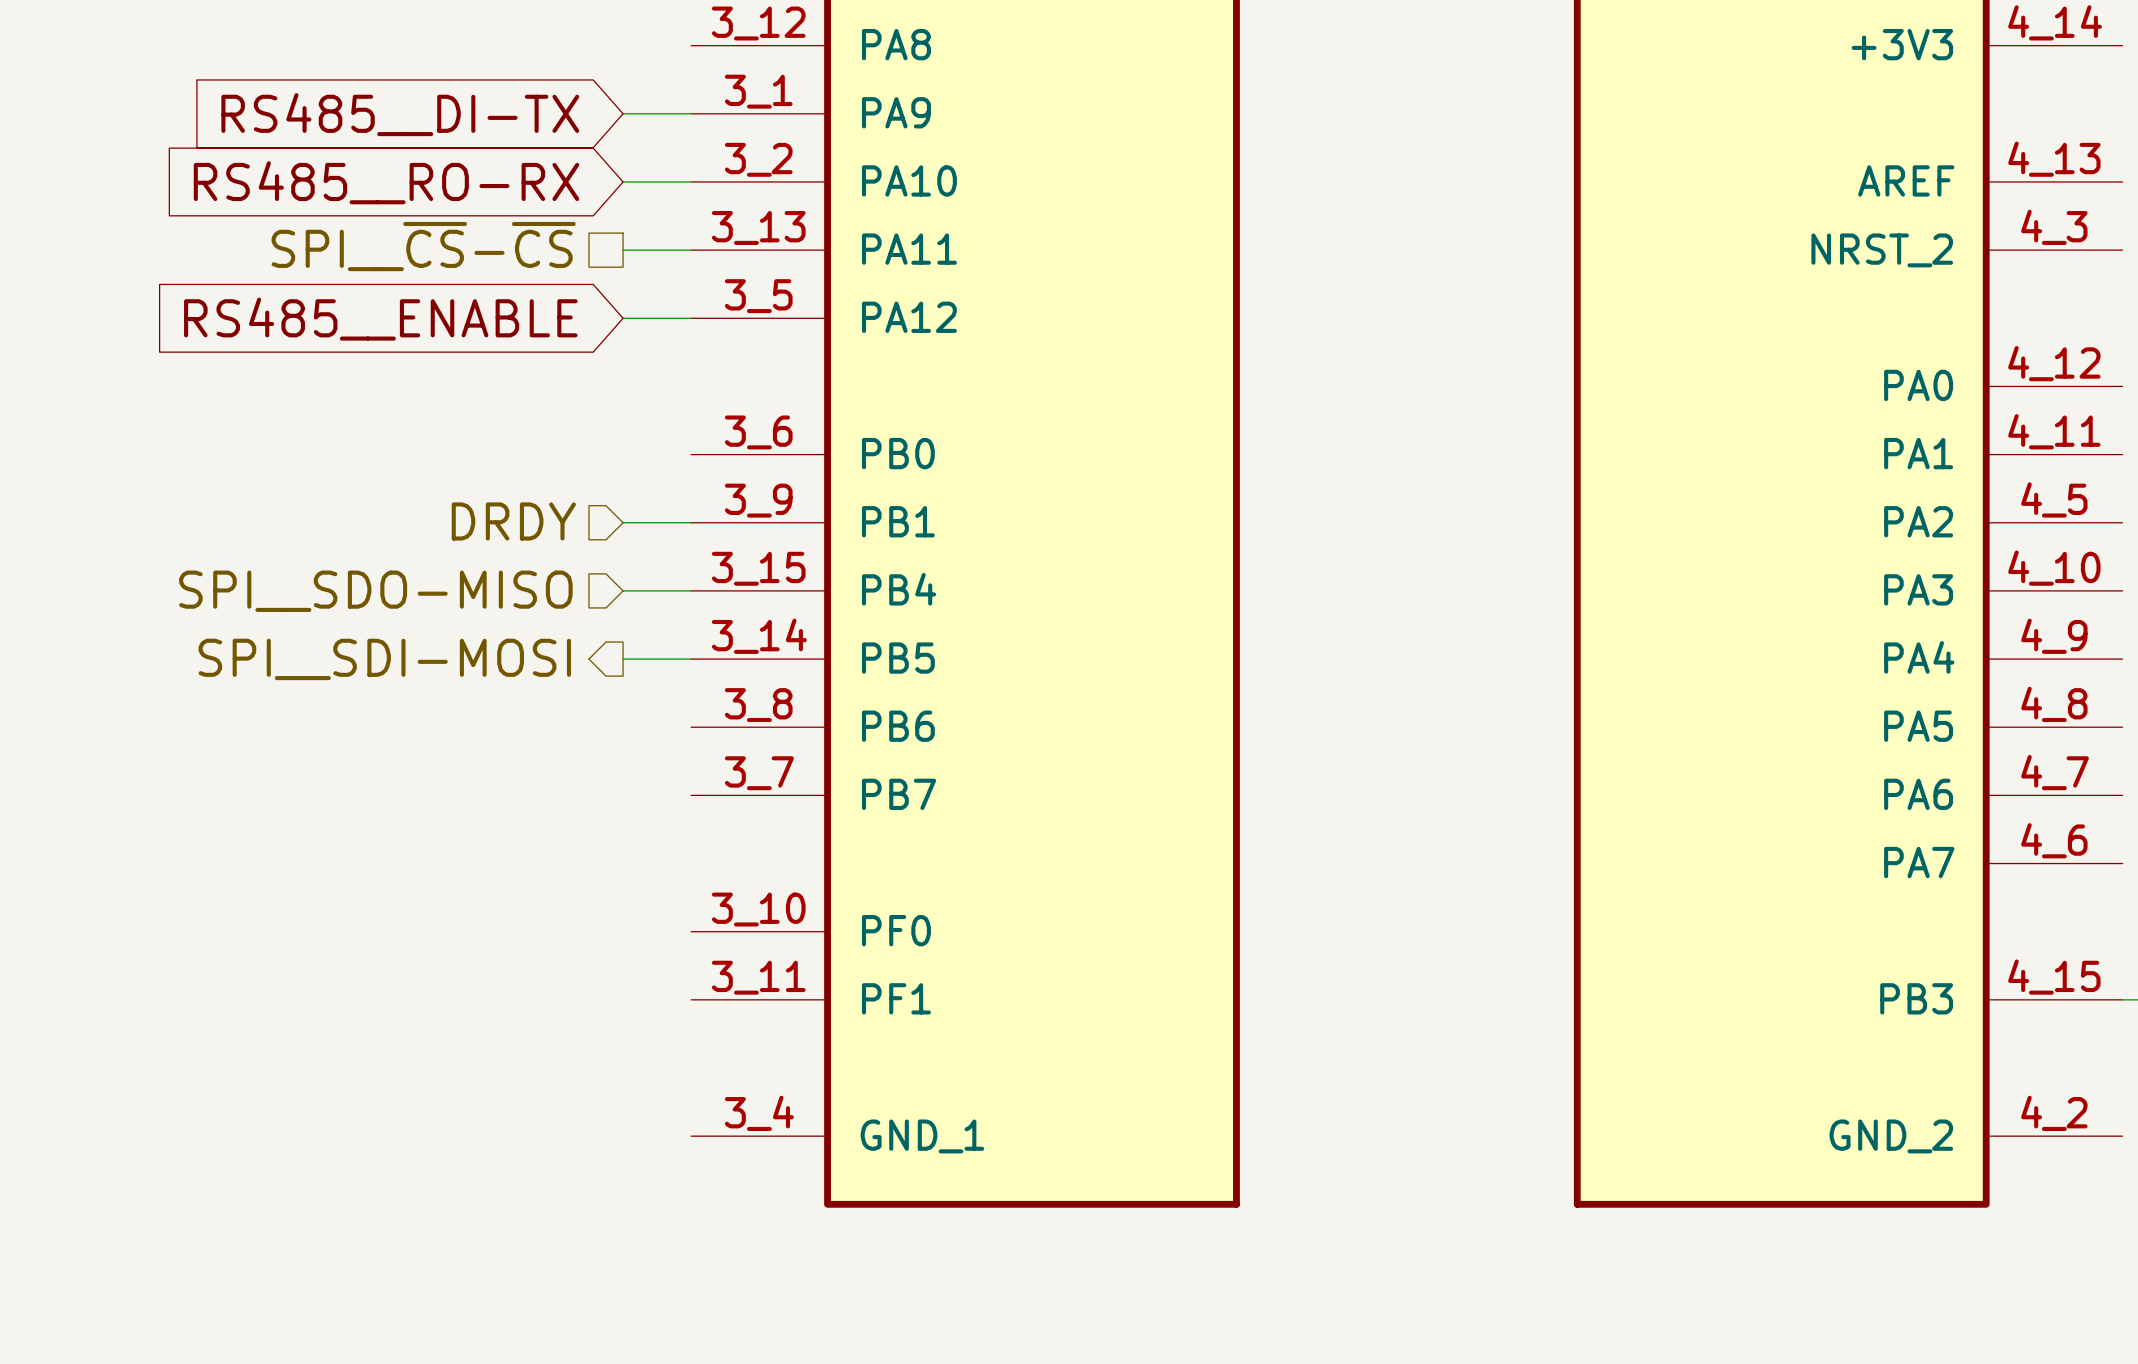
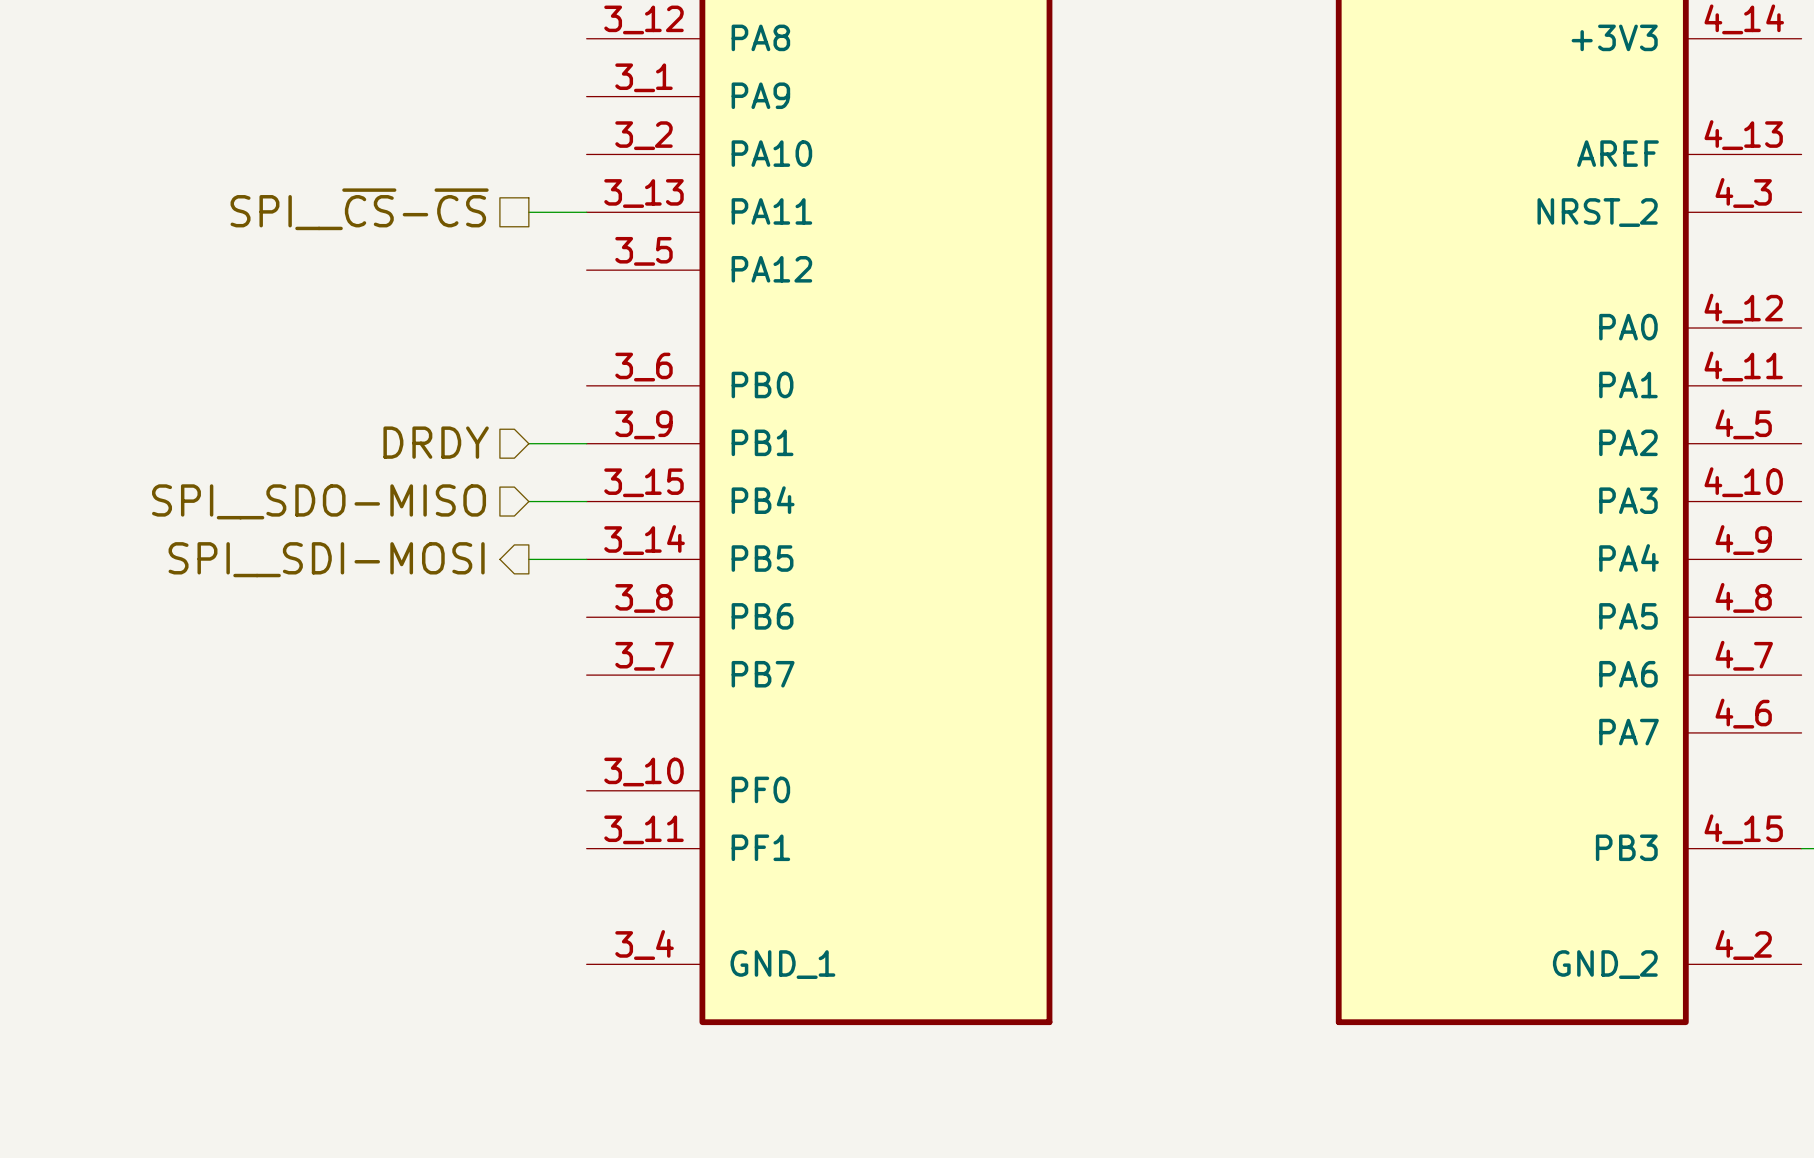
wire: (623, 113) (691, 113) -> none
global label: RS485__DI-TX (400, 114) -> none
wire: (623, 181) (691, 181) -> none
global label: RS485__RO-RX (386, 182) -> none
wire: (623, 318) (691, 318) -> none
global label: RS485__ENABLE (380, 319) -> none

